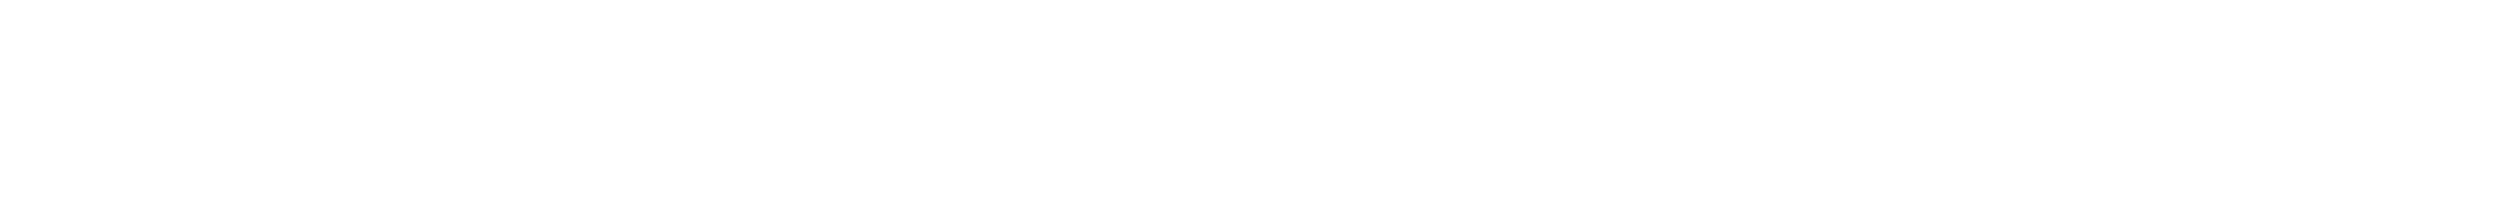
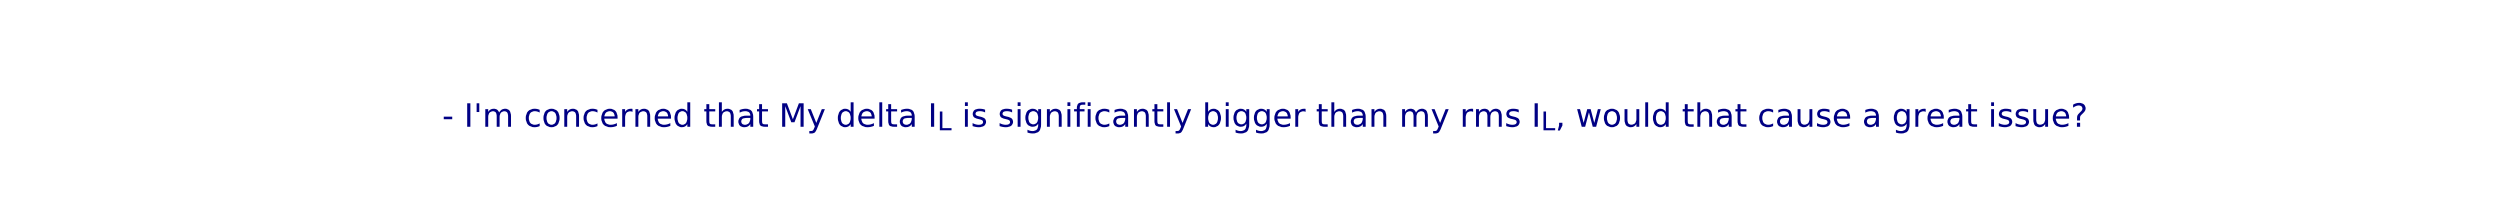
text: none -> - I'm concerned that My delta IL is significantly bigger than my rms IL, would that cause a great issue? (1264, 117)

